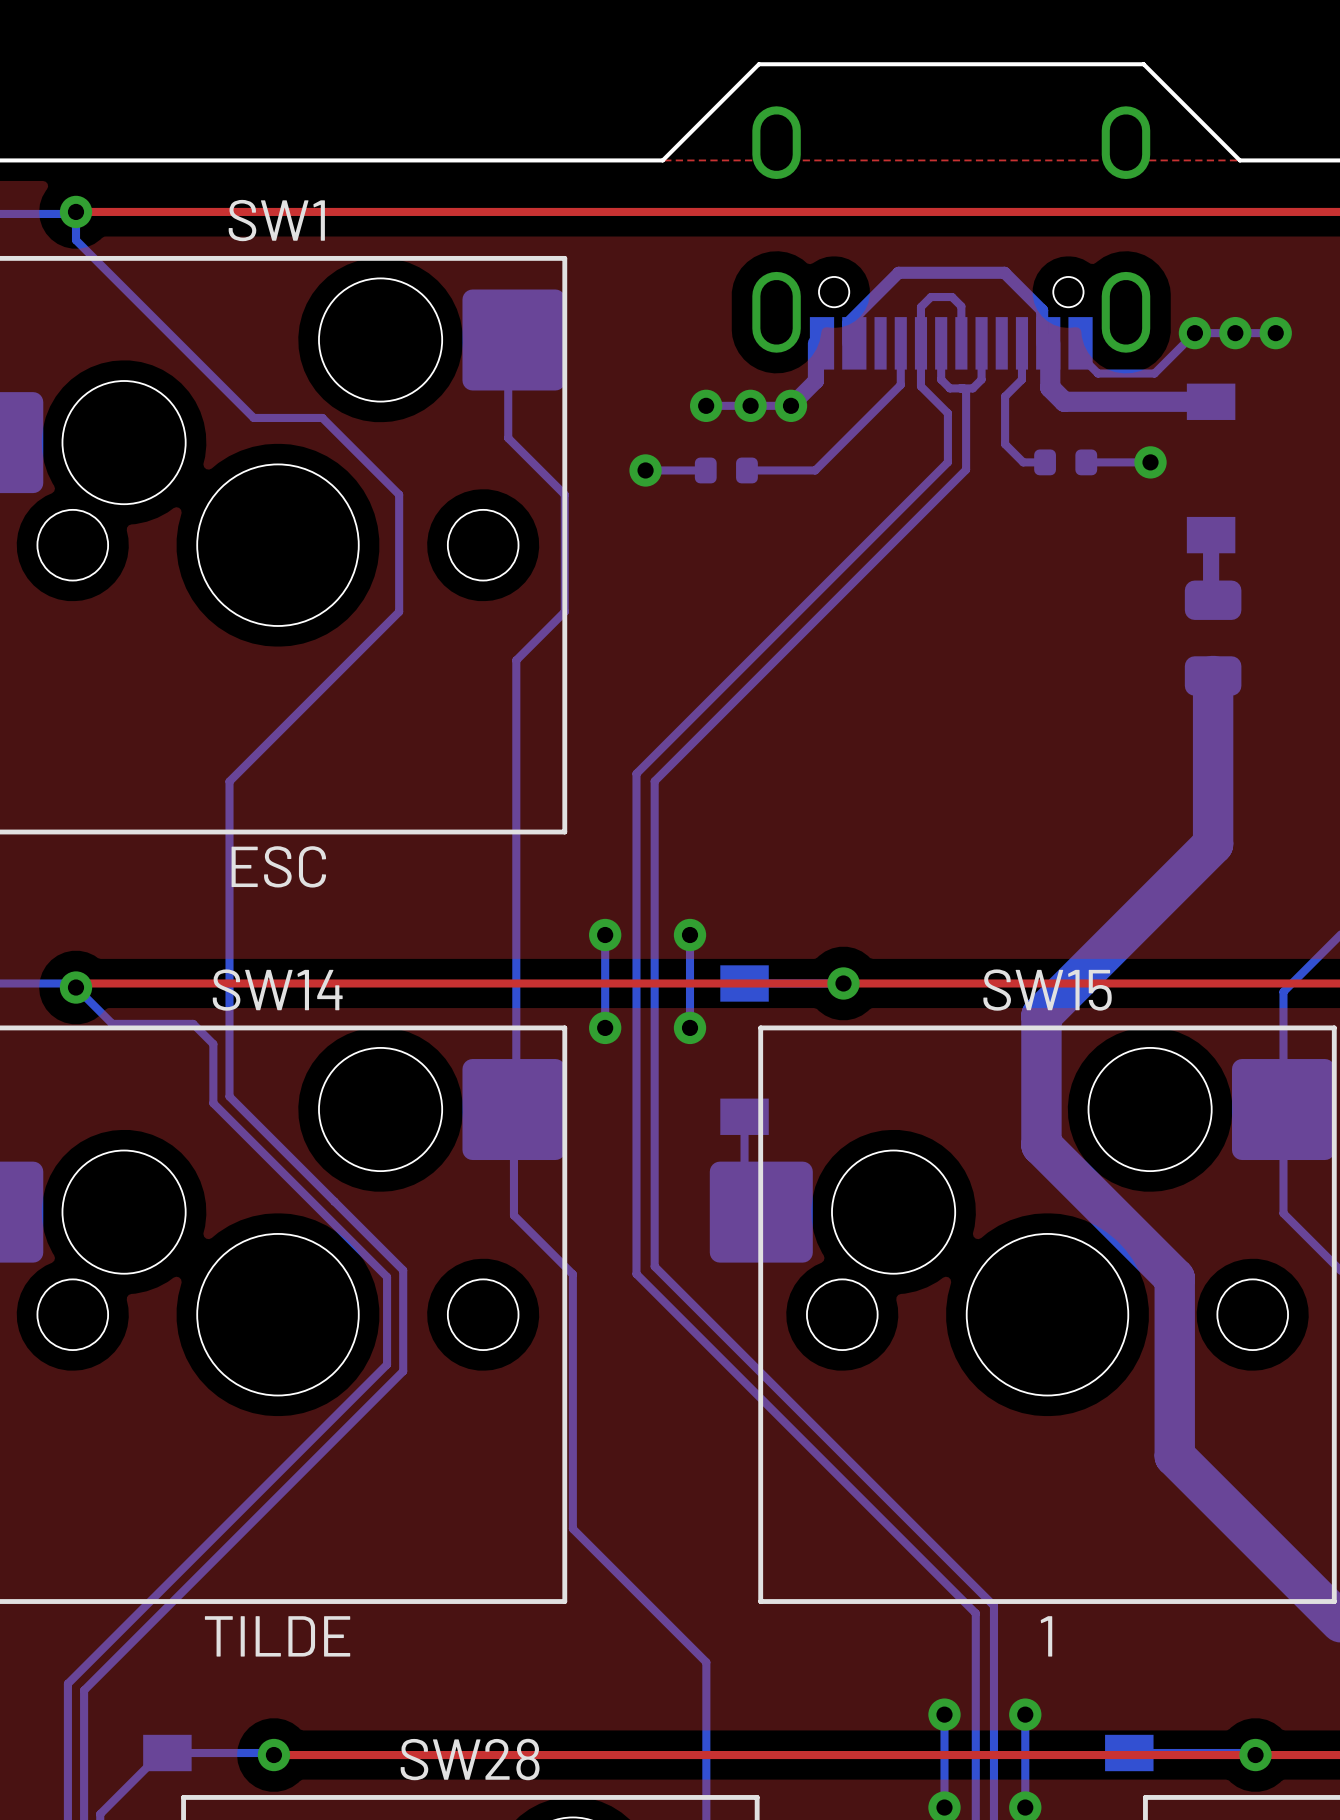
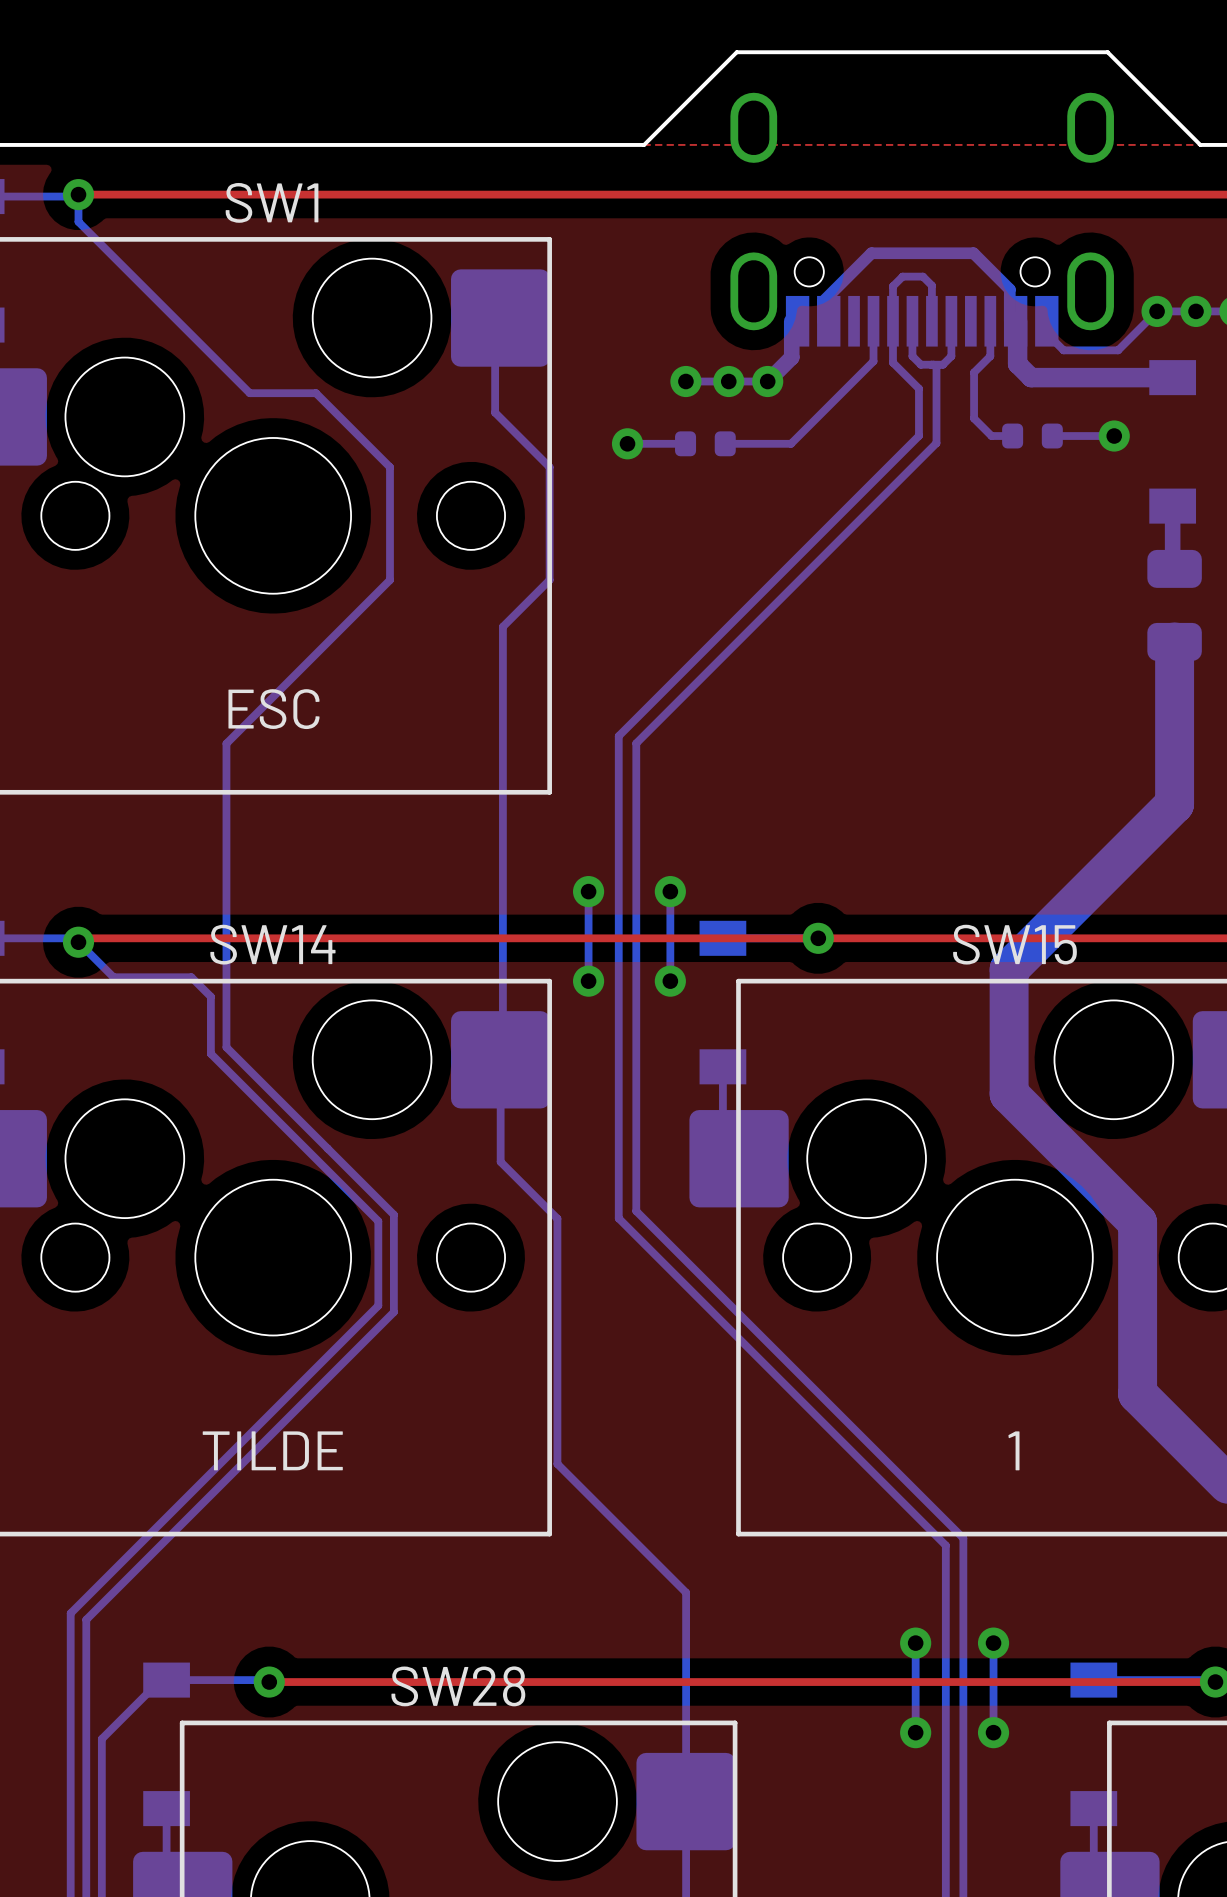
SW1 value position: ESC (278, 866) -> ESC (273, 709)
SW14 value position: TILDE (277, 1636) -> TILDE (272, 1450)
SW15 value position: 1 (1046, 1636) -> 1 (1013, 1450)

